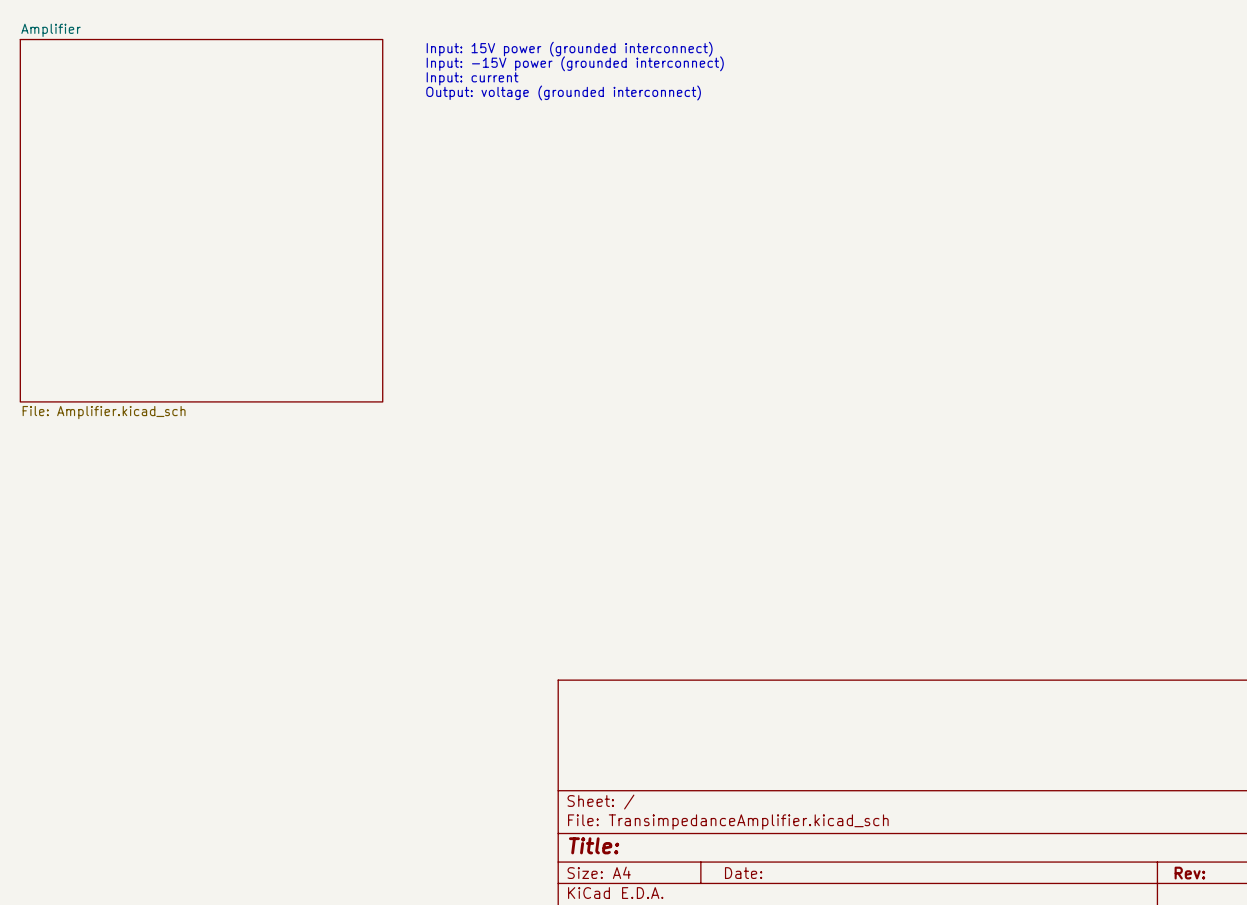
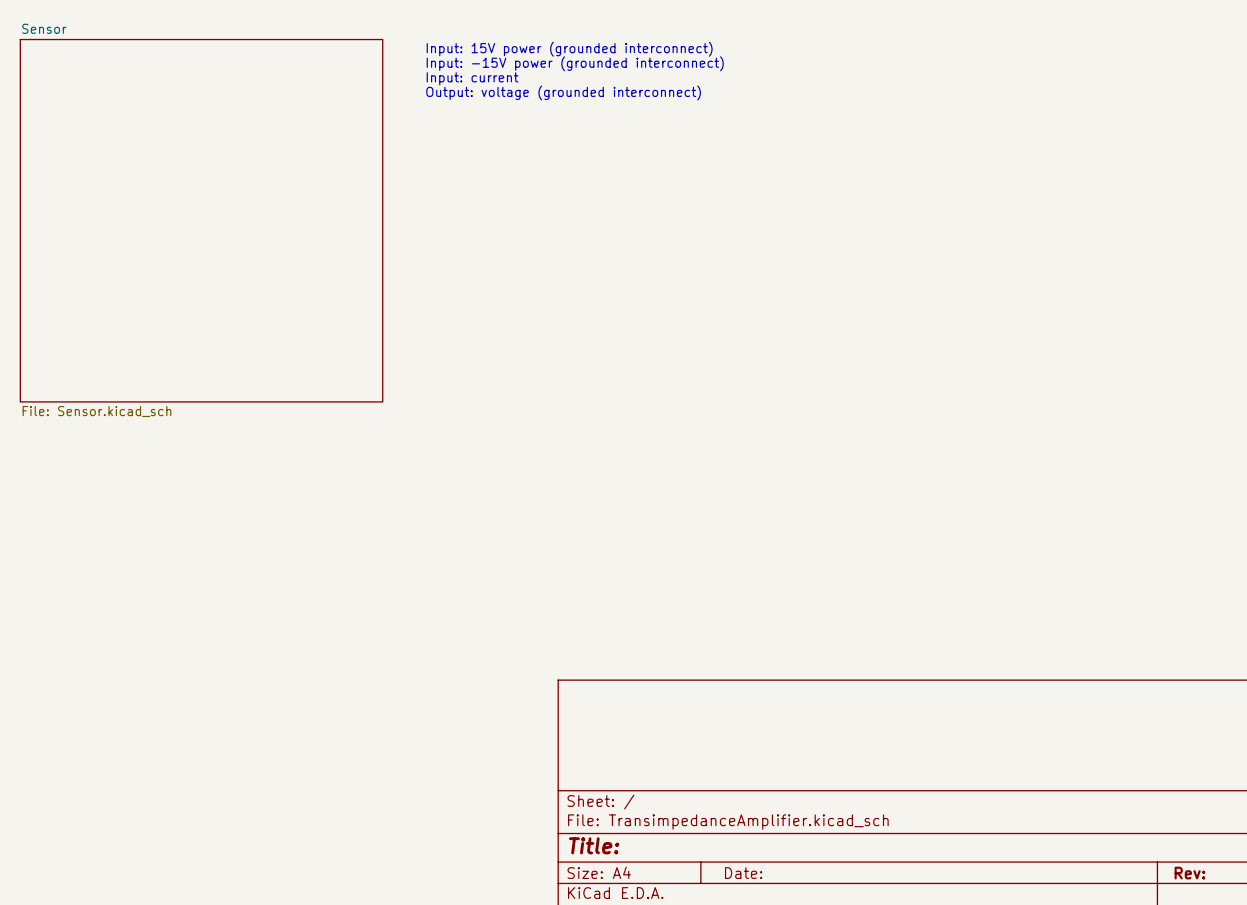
sheet Amplifier name: Amplifier (51, 30) -> Sensor (44, 28)
sheet Amplifier value: File: Amplifier.kicad_sch (104, 412) -> File: Sensor.kicad_sch (96, 411)

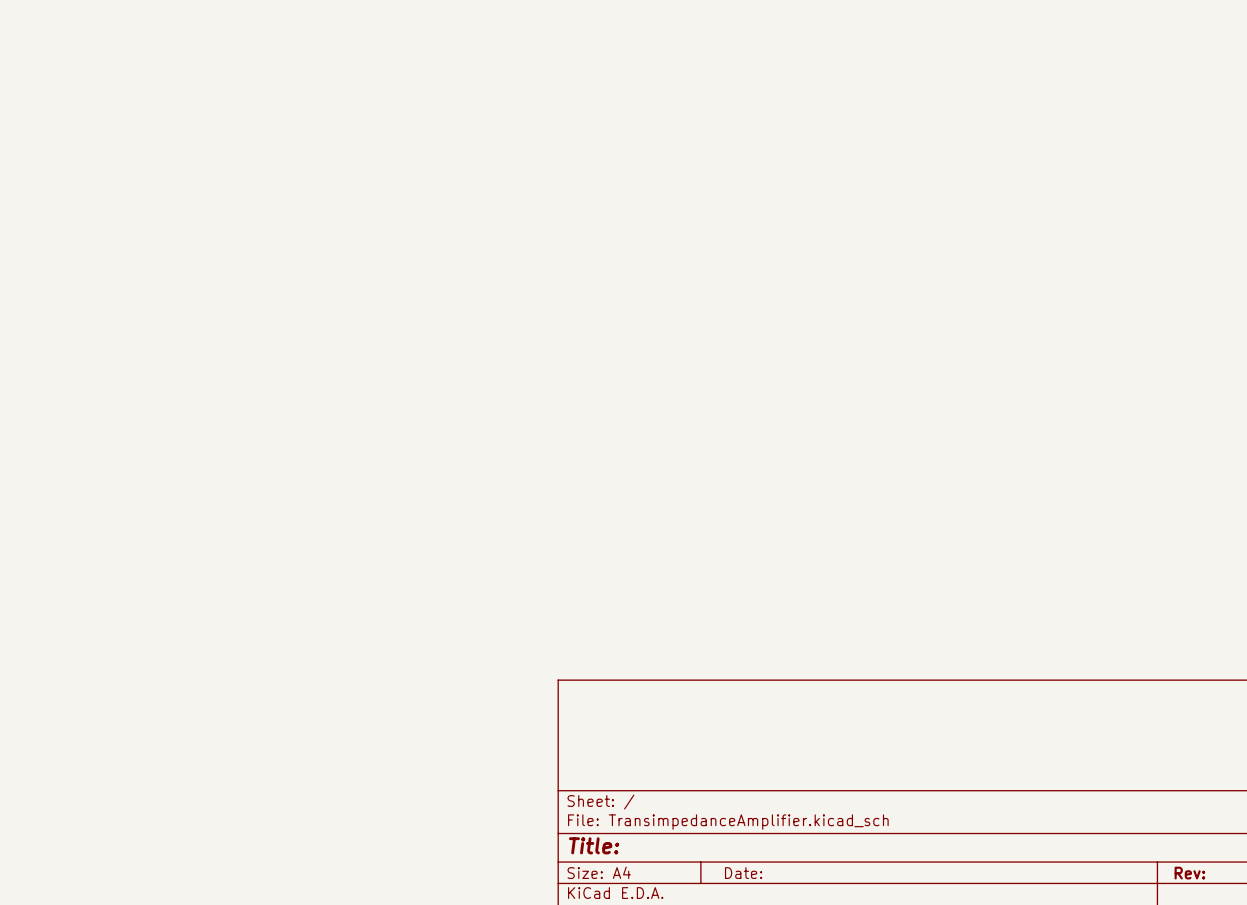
text: Input: 15V power (grounded interconnect) (569, 49) -> none
text: Input: -15V power (grounded interconnect) (575, 63) -> none
text: Input: current (472, 78) -> none
text: Output: voltage (grounded interconnect) (563, 92) -> none
sheet Sensor: File: Sensor.kicad_sch (201, 220) -> none

